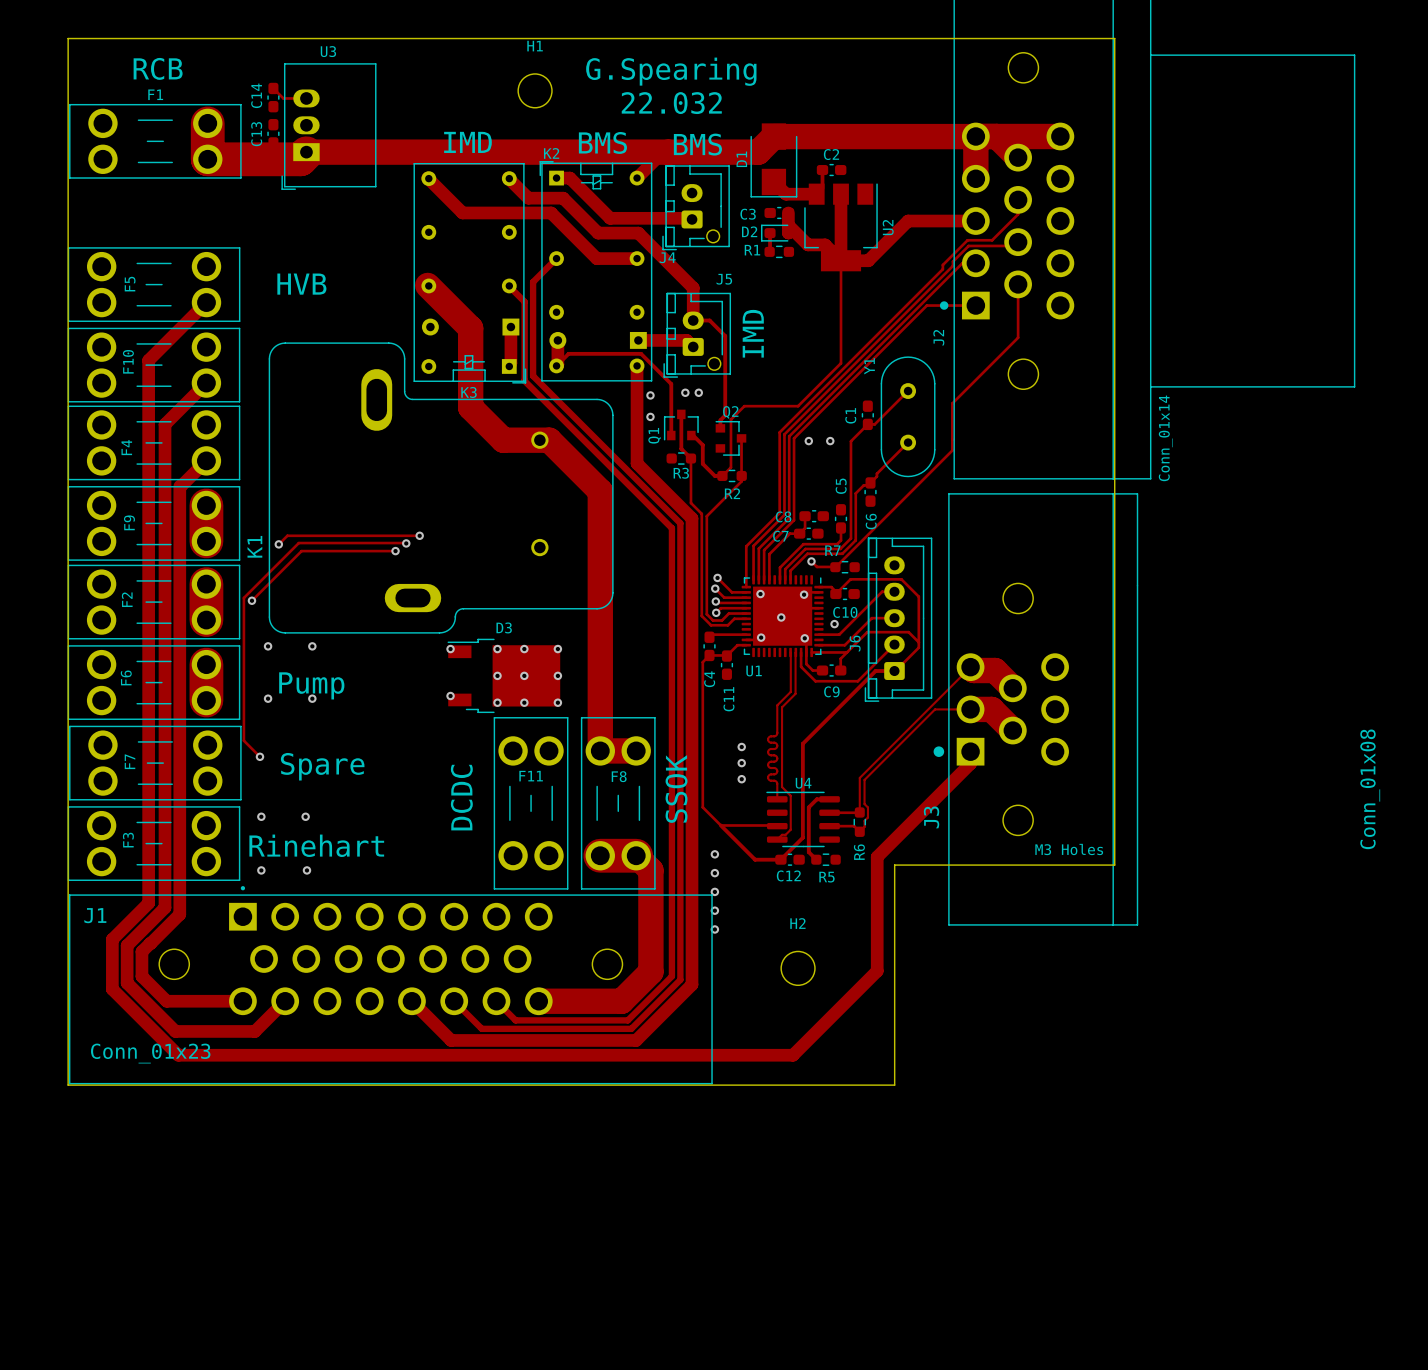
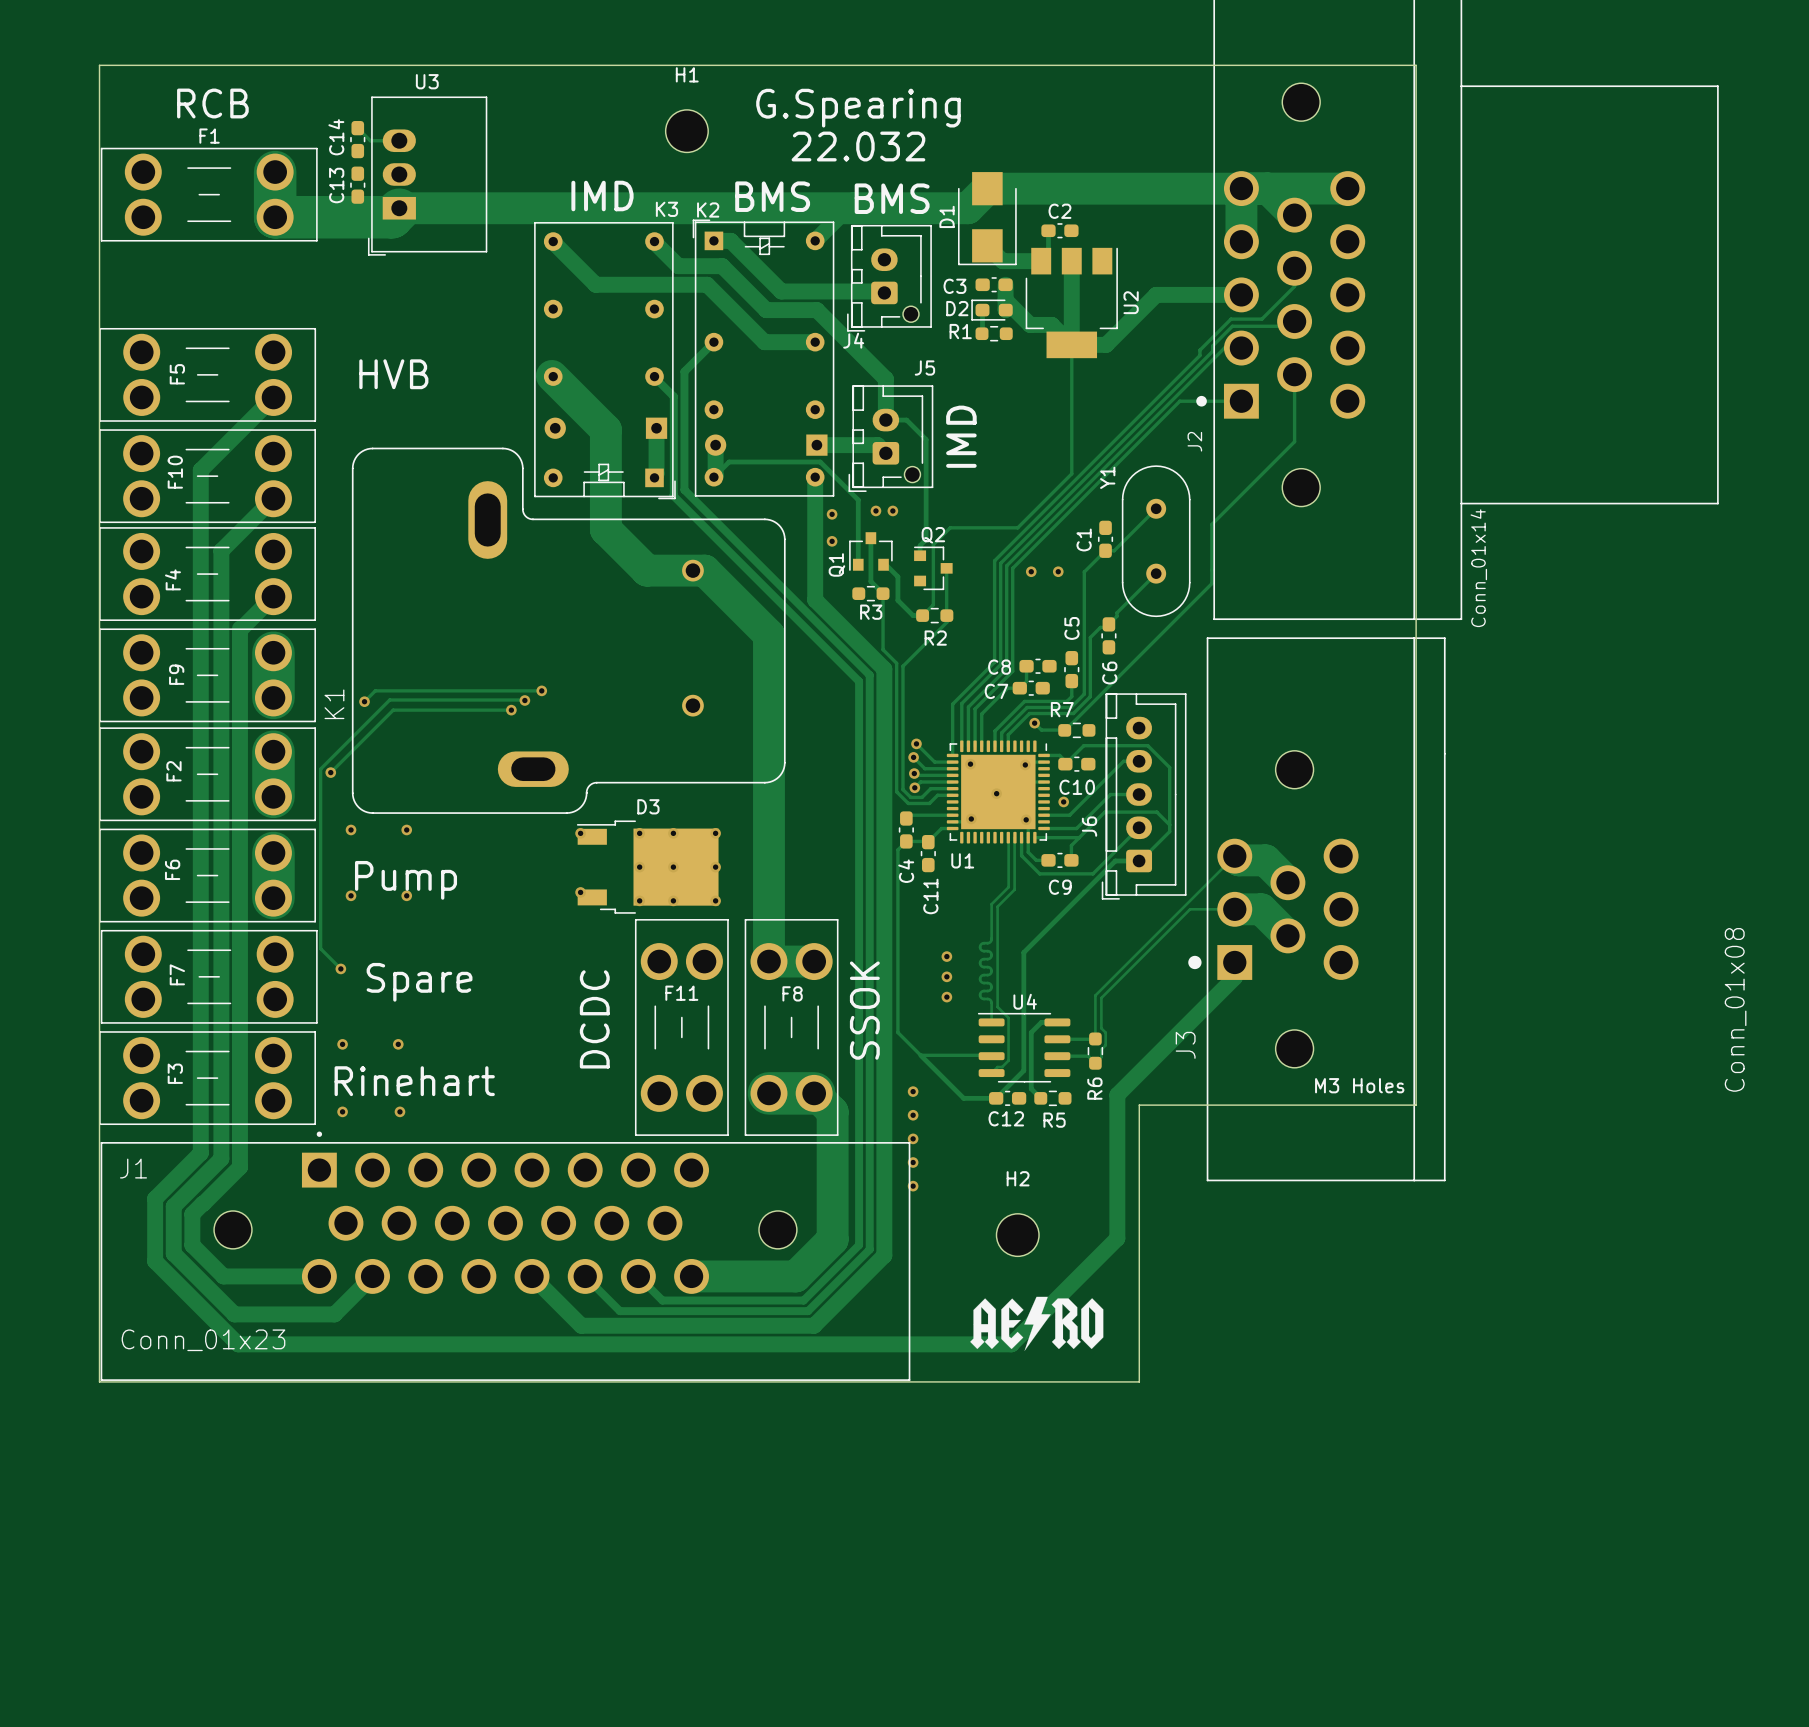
K3 name position: K3 (469, 392) -> K3 (666, 209)
drawing: none -> [970, 1296, 1104, 1351]

